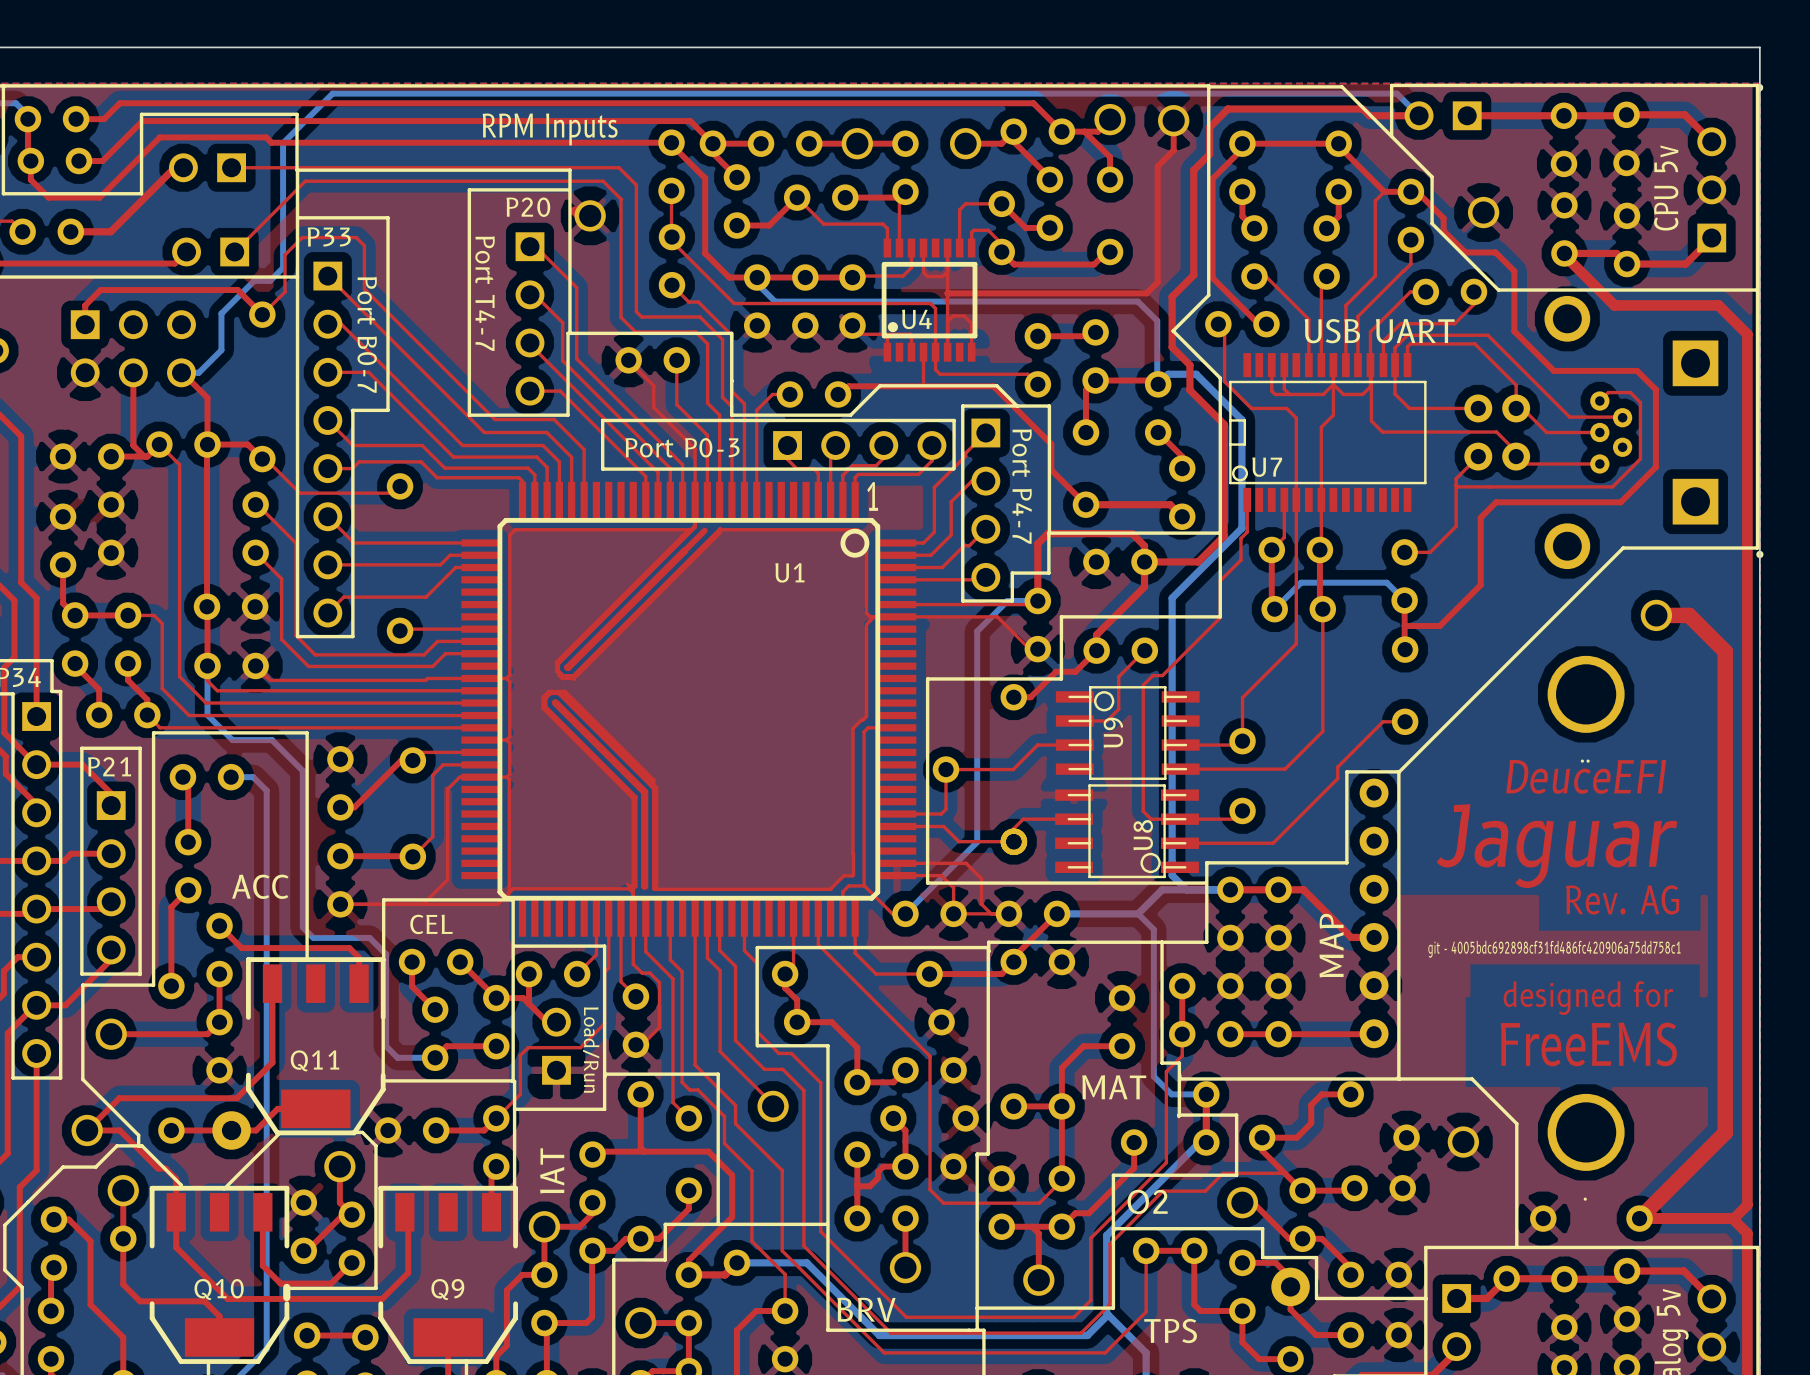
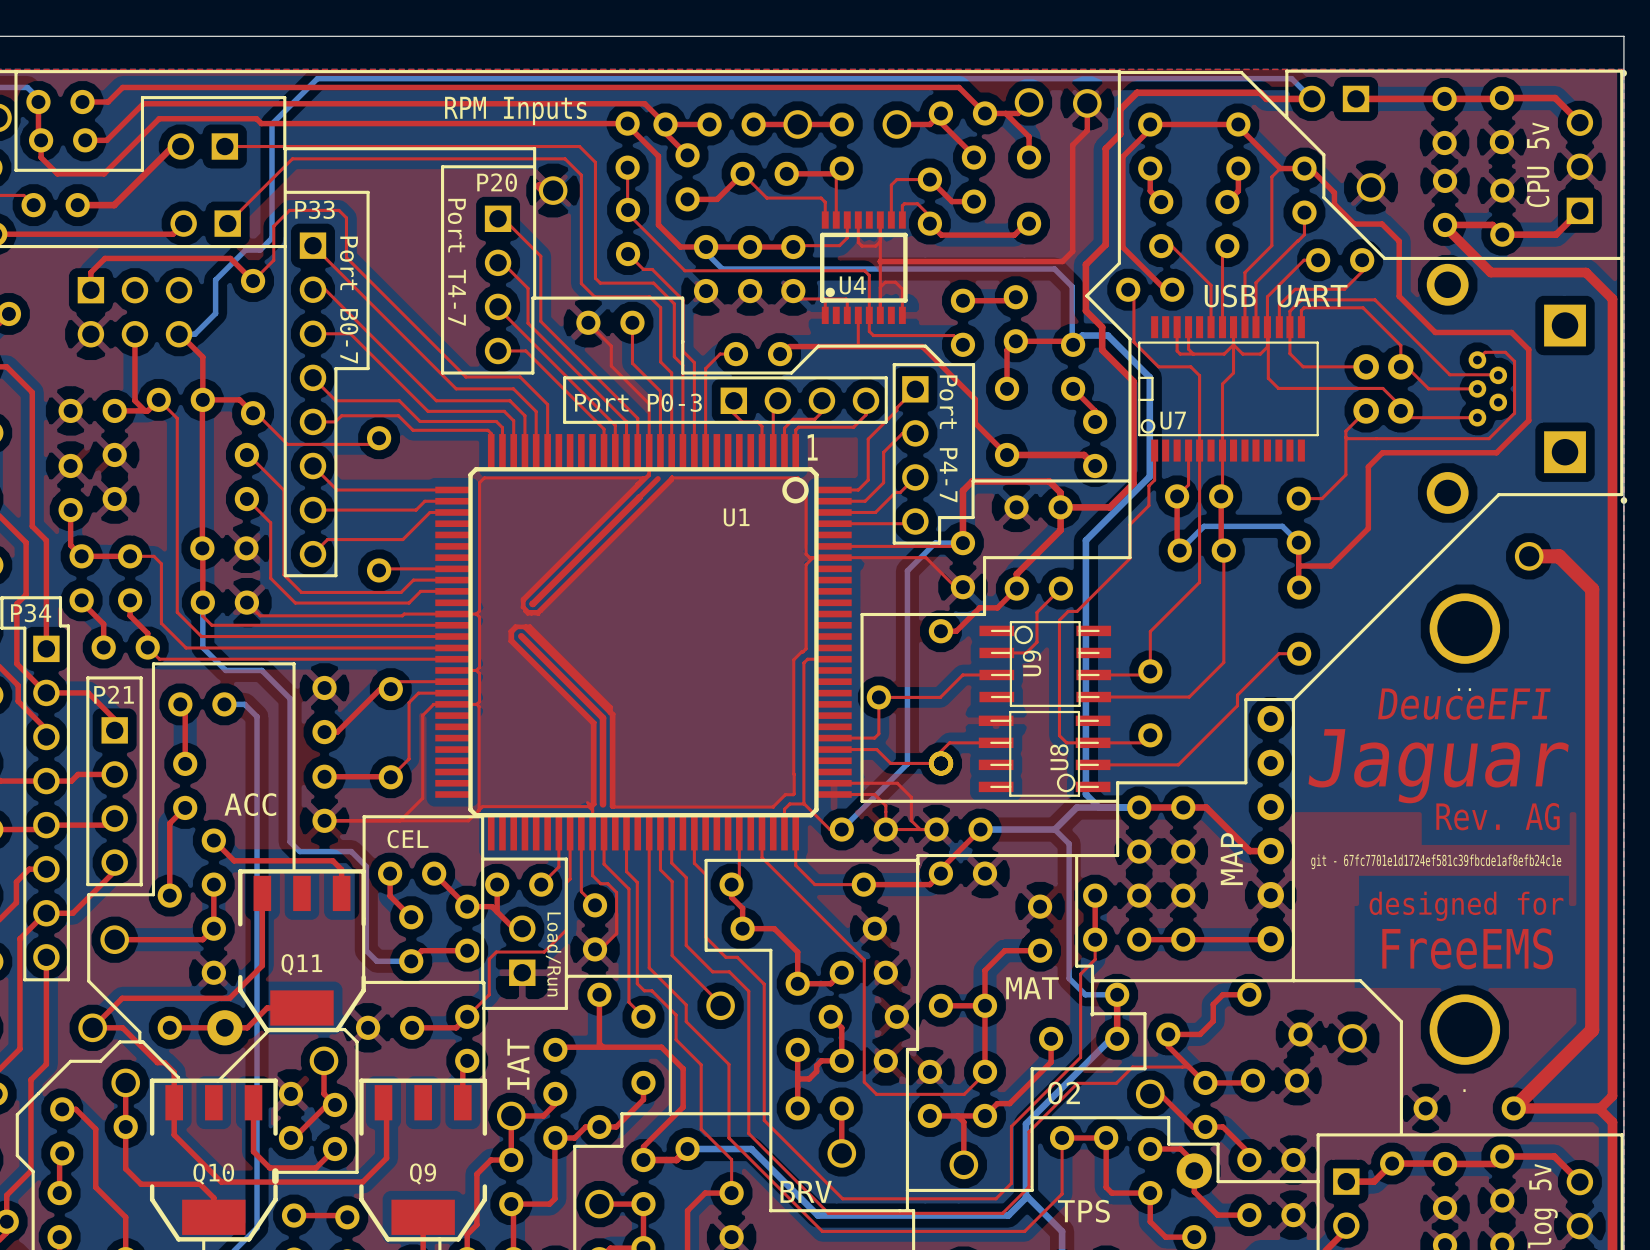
text: git - 4005bdc692898cf31fd486fc420906a75dd758c1 (1554, 949) -> git - 67fc7701e1d1724ef581c39fbcde1af8efb24c1e (1436, 861)

